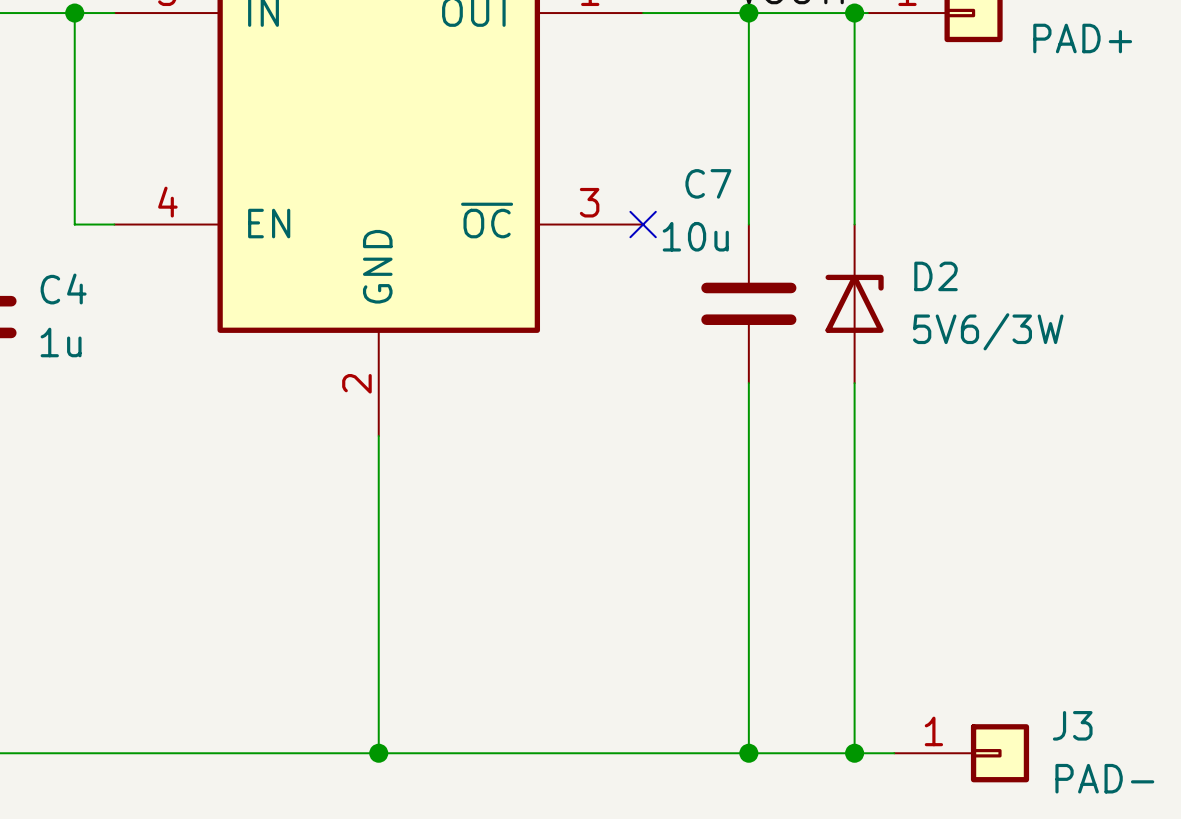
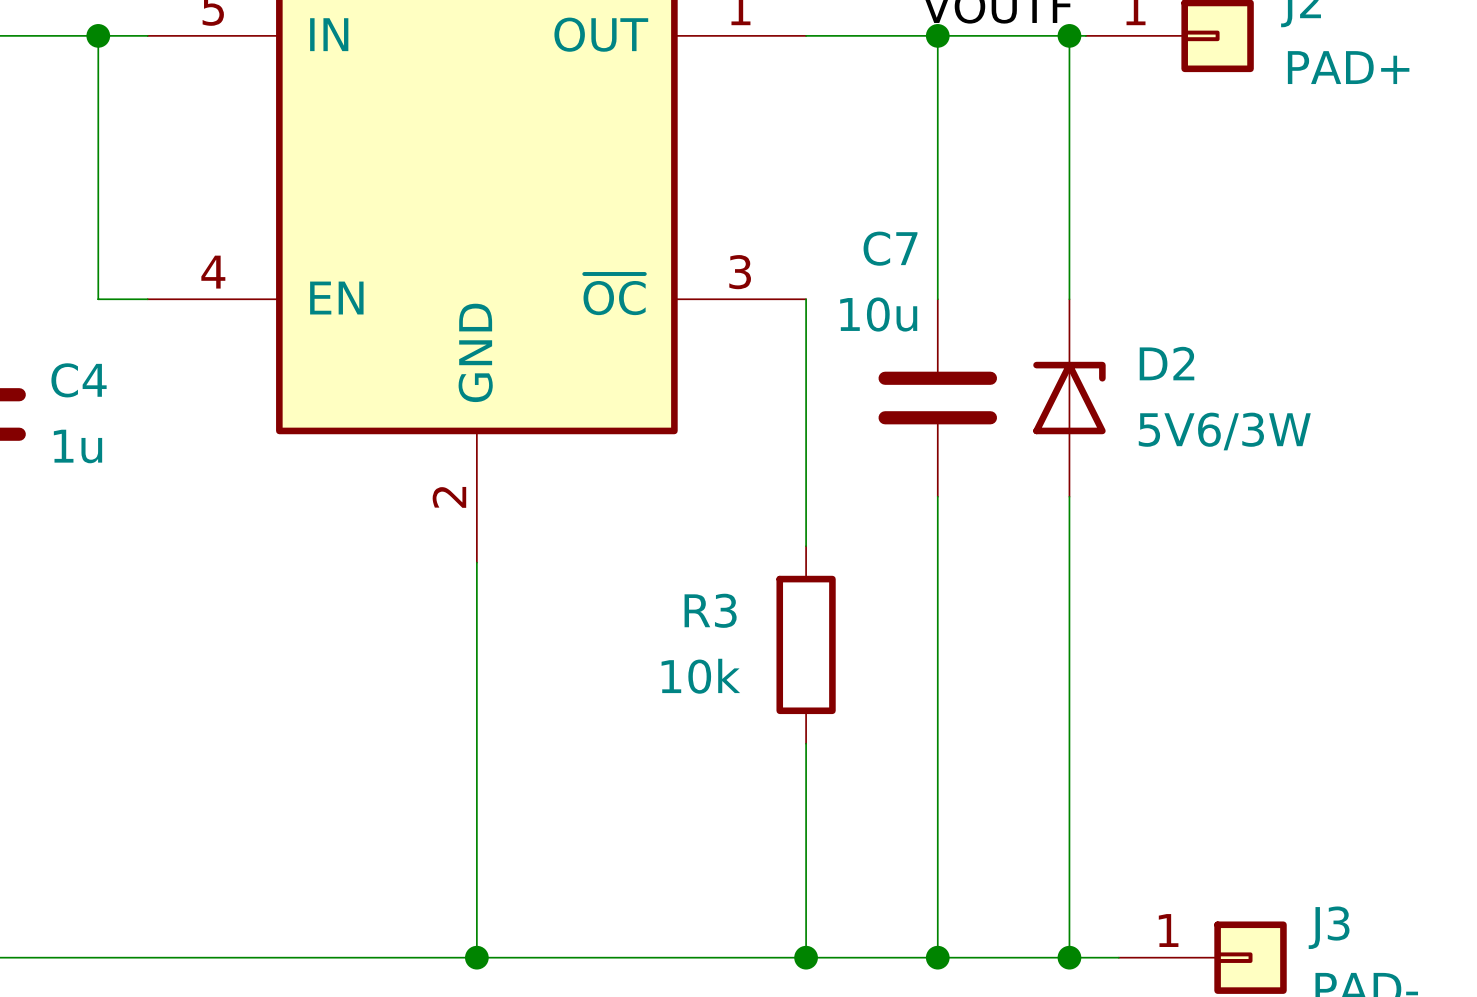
wire: none -> (806, 299) (806, 546)
no-connect mark: (643, 224) -> none
R3: none -> 10k (806, 644)
wire: none -> (806, 743) (806, 957)
junction: none -> (806, 957)

